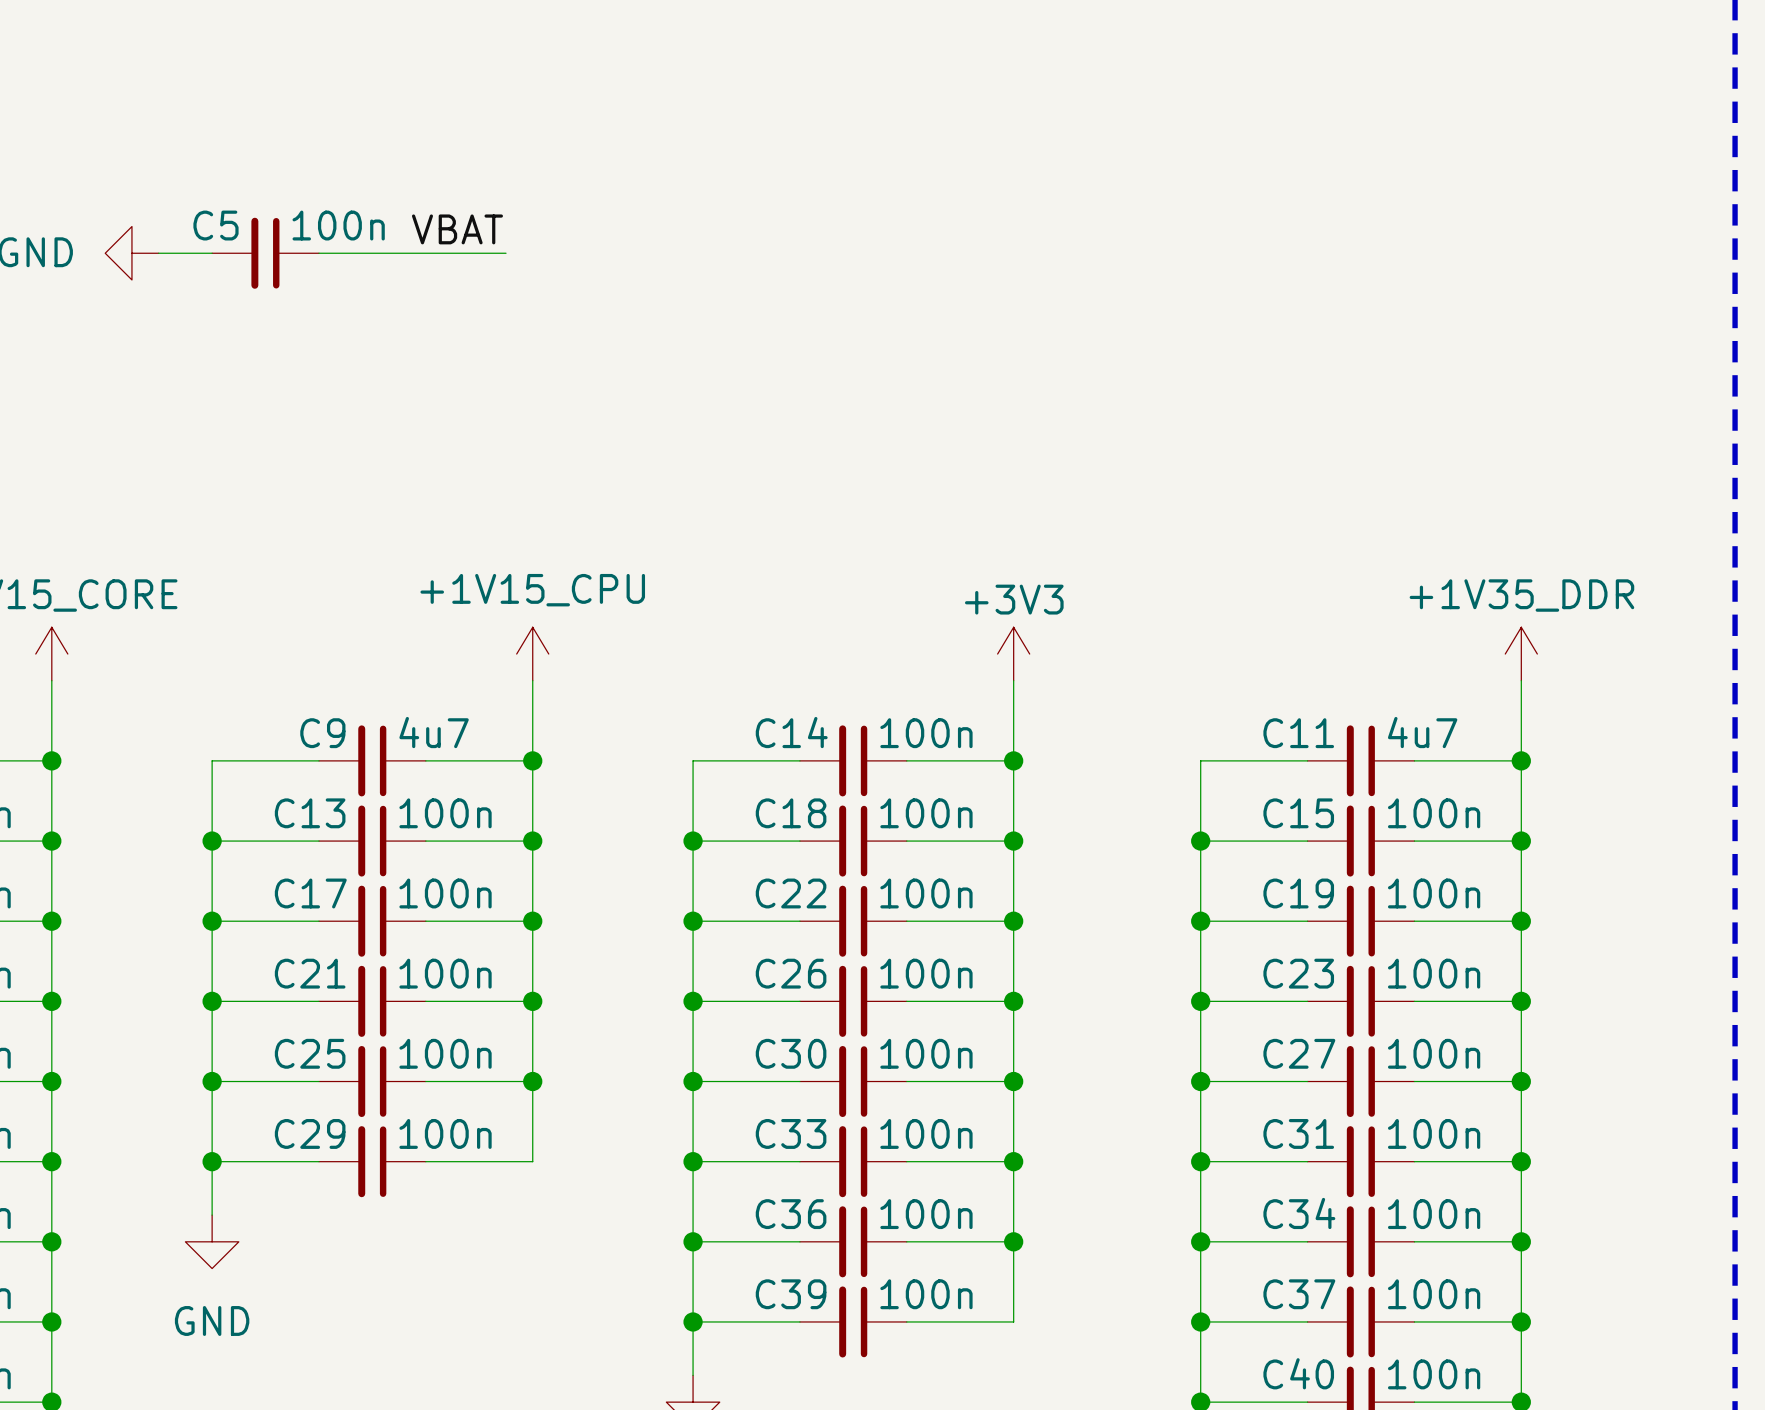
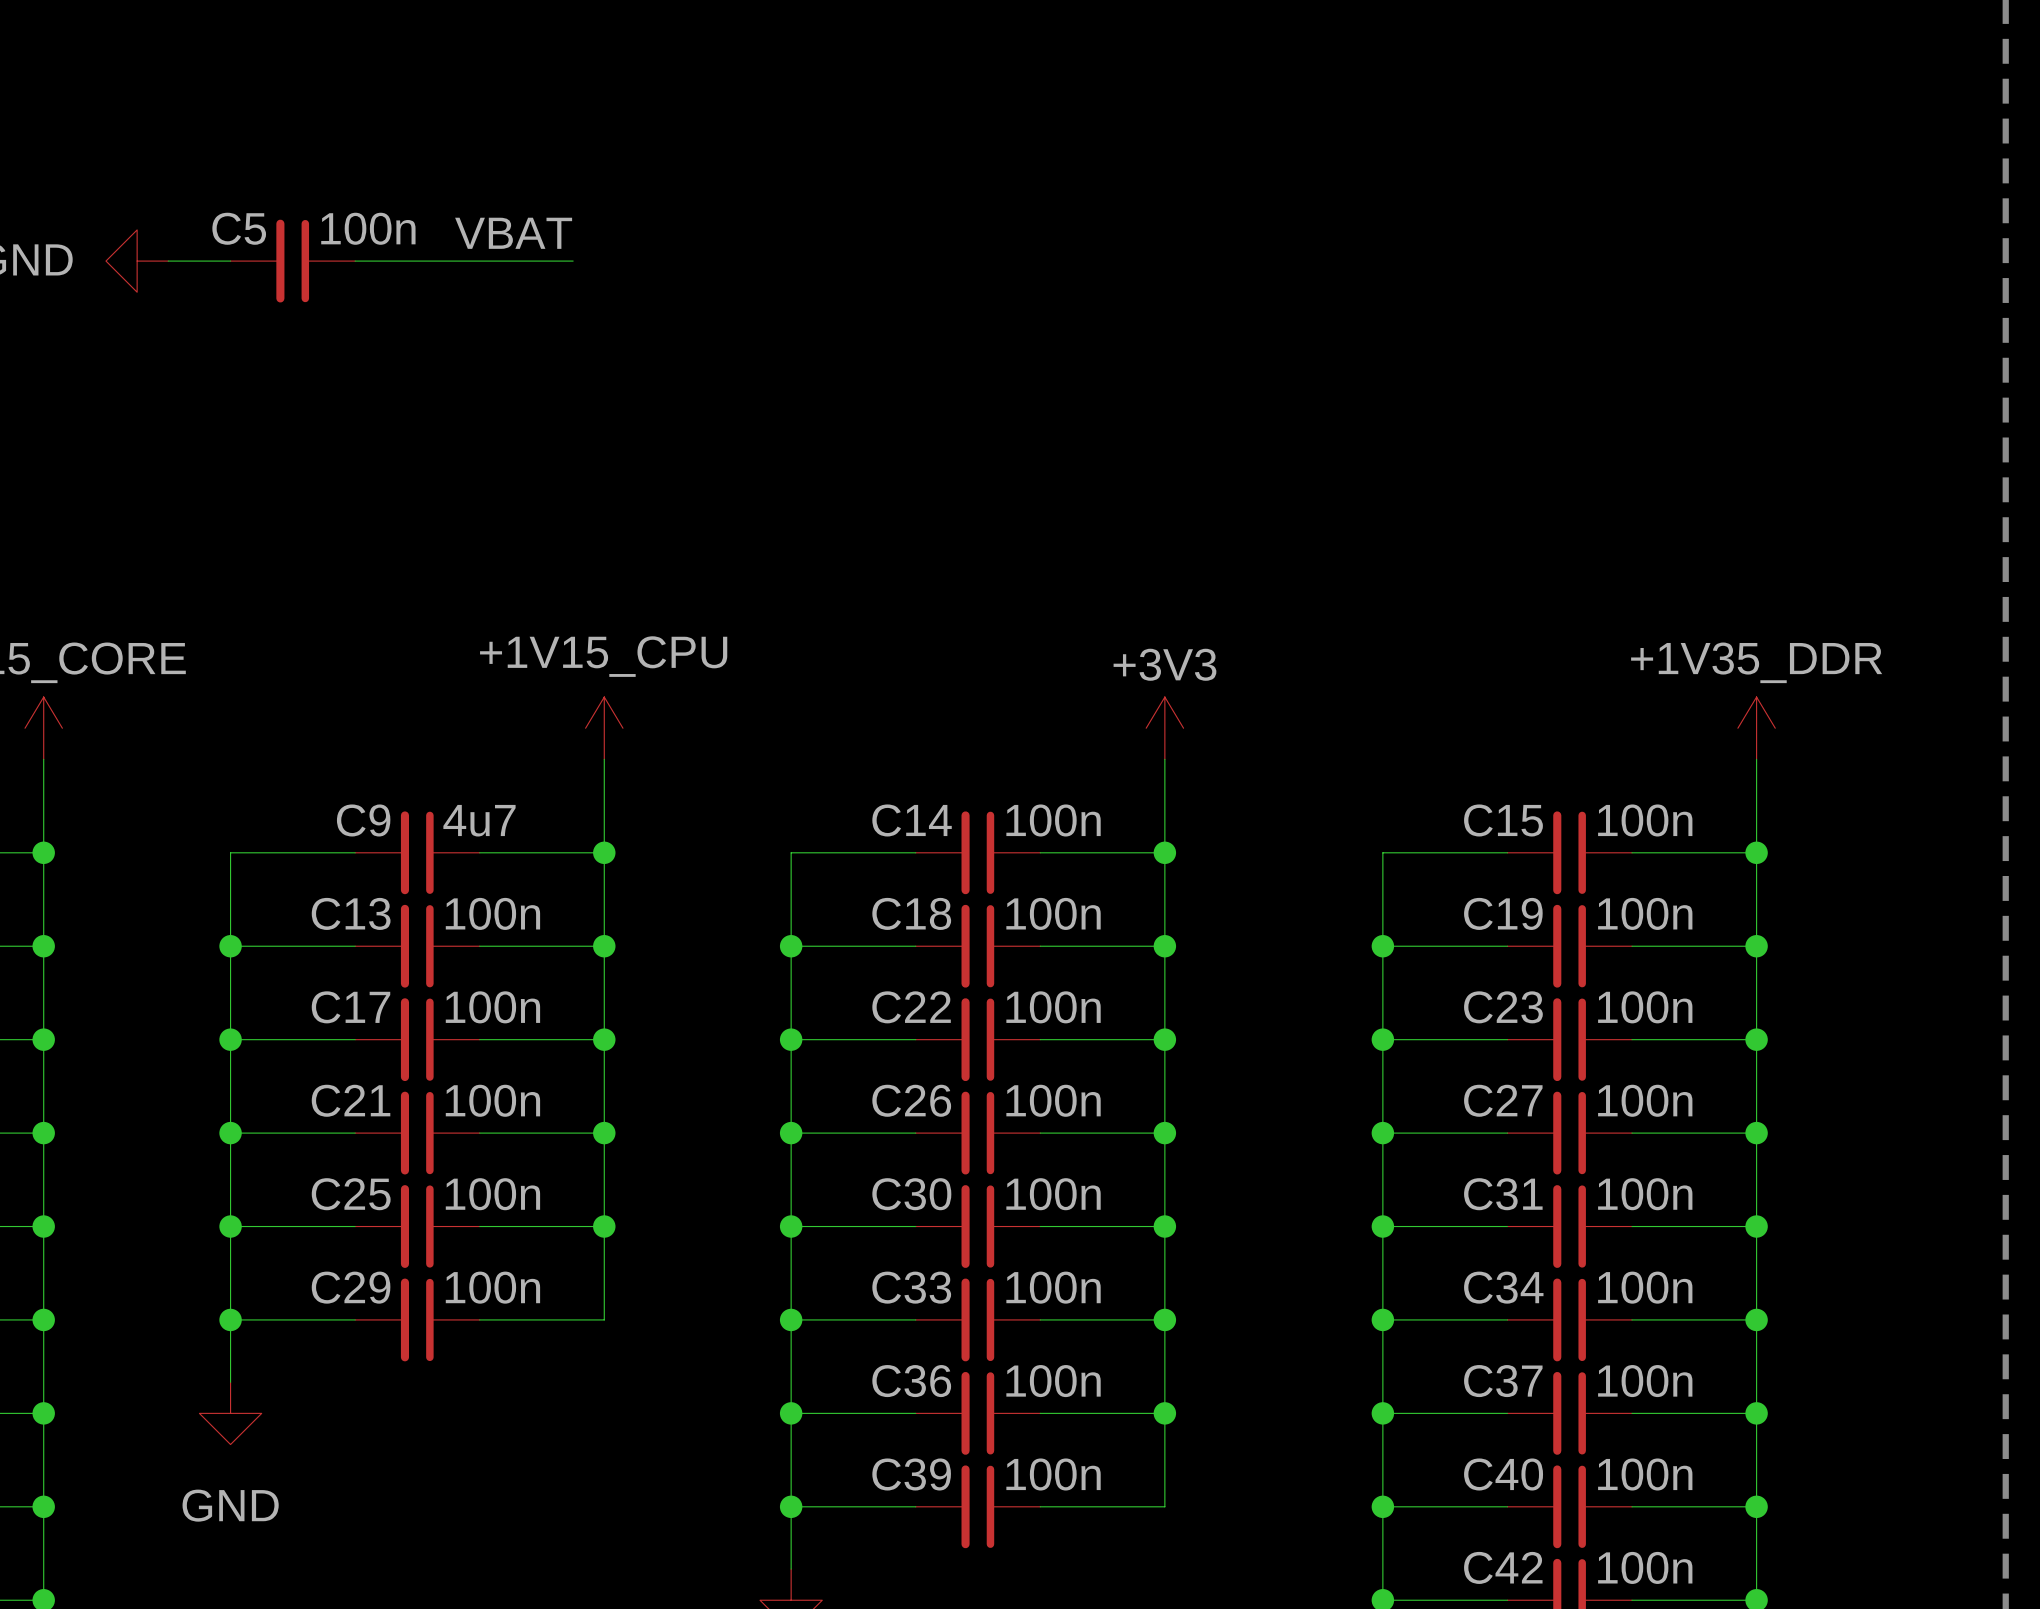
C11 value: 4u7 (1422, 732) -> 100n (1645, 820)
C11 name: C11 (1298, 733) -> C15 (1503, 820)
C15 name: C15 (1298, 813) -> C19 (1503, 913)
C19 name: C19 (1298, 893) -> C23 (1503, 1007)
C23 name: C23 (1298, 973) -> C27 (1503, 1100)
C27 name: C27 (1299, 1053) -> C31 (1503, 1194)
C31 name: C31 (1298, 1133) -> C34 (1503, 1287)
C34 name: C34 (1299, 1213) -> C37 (1503, 1381)
C37 name: C37 (1299, 1294) -> C40 (1503, 1474)
C40 name: C40 (1298, 1373) -> C42 (1503, 1567)

